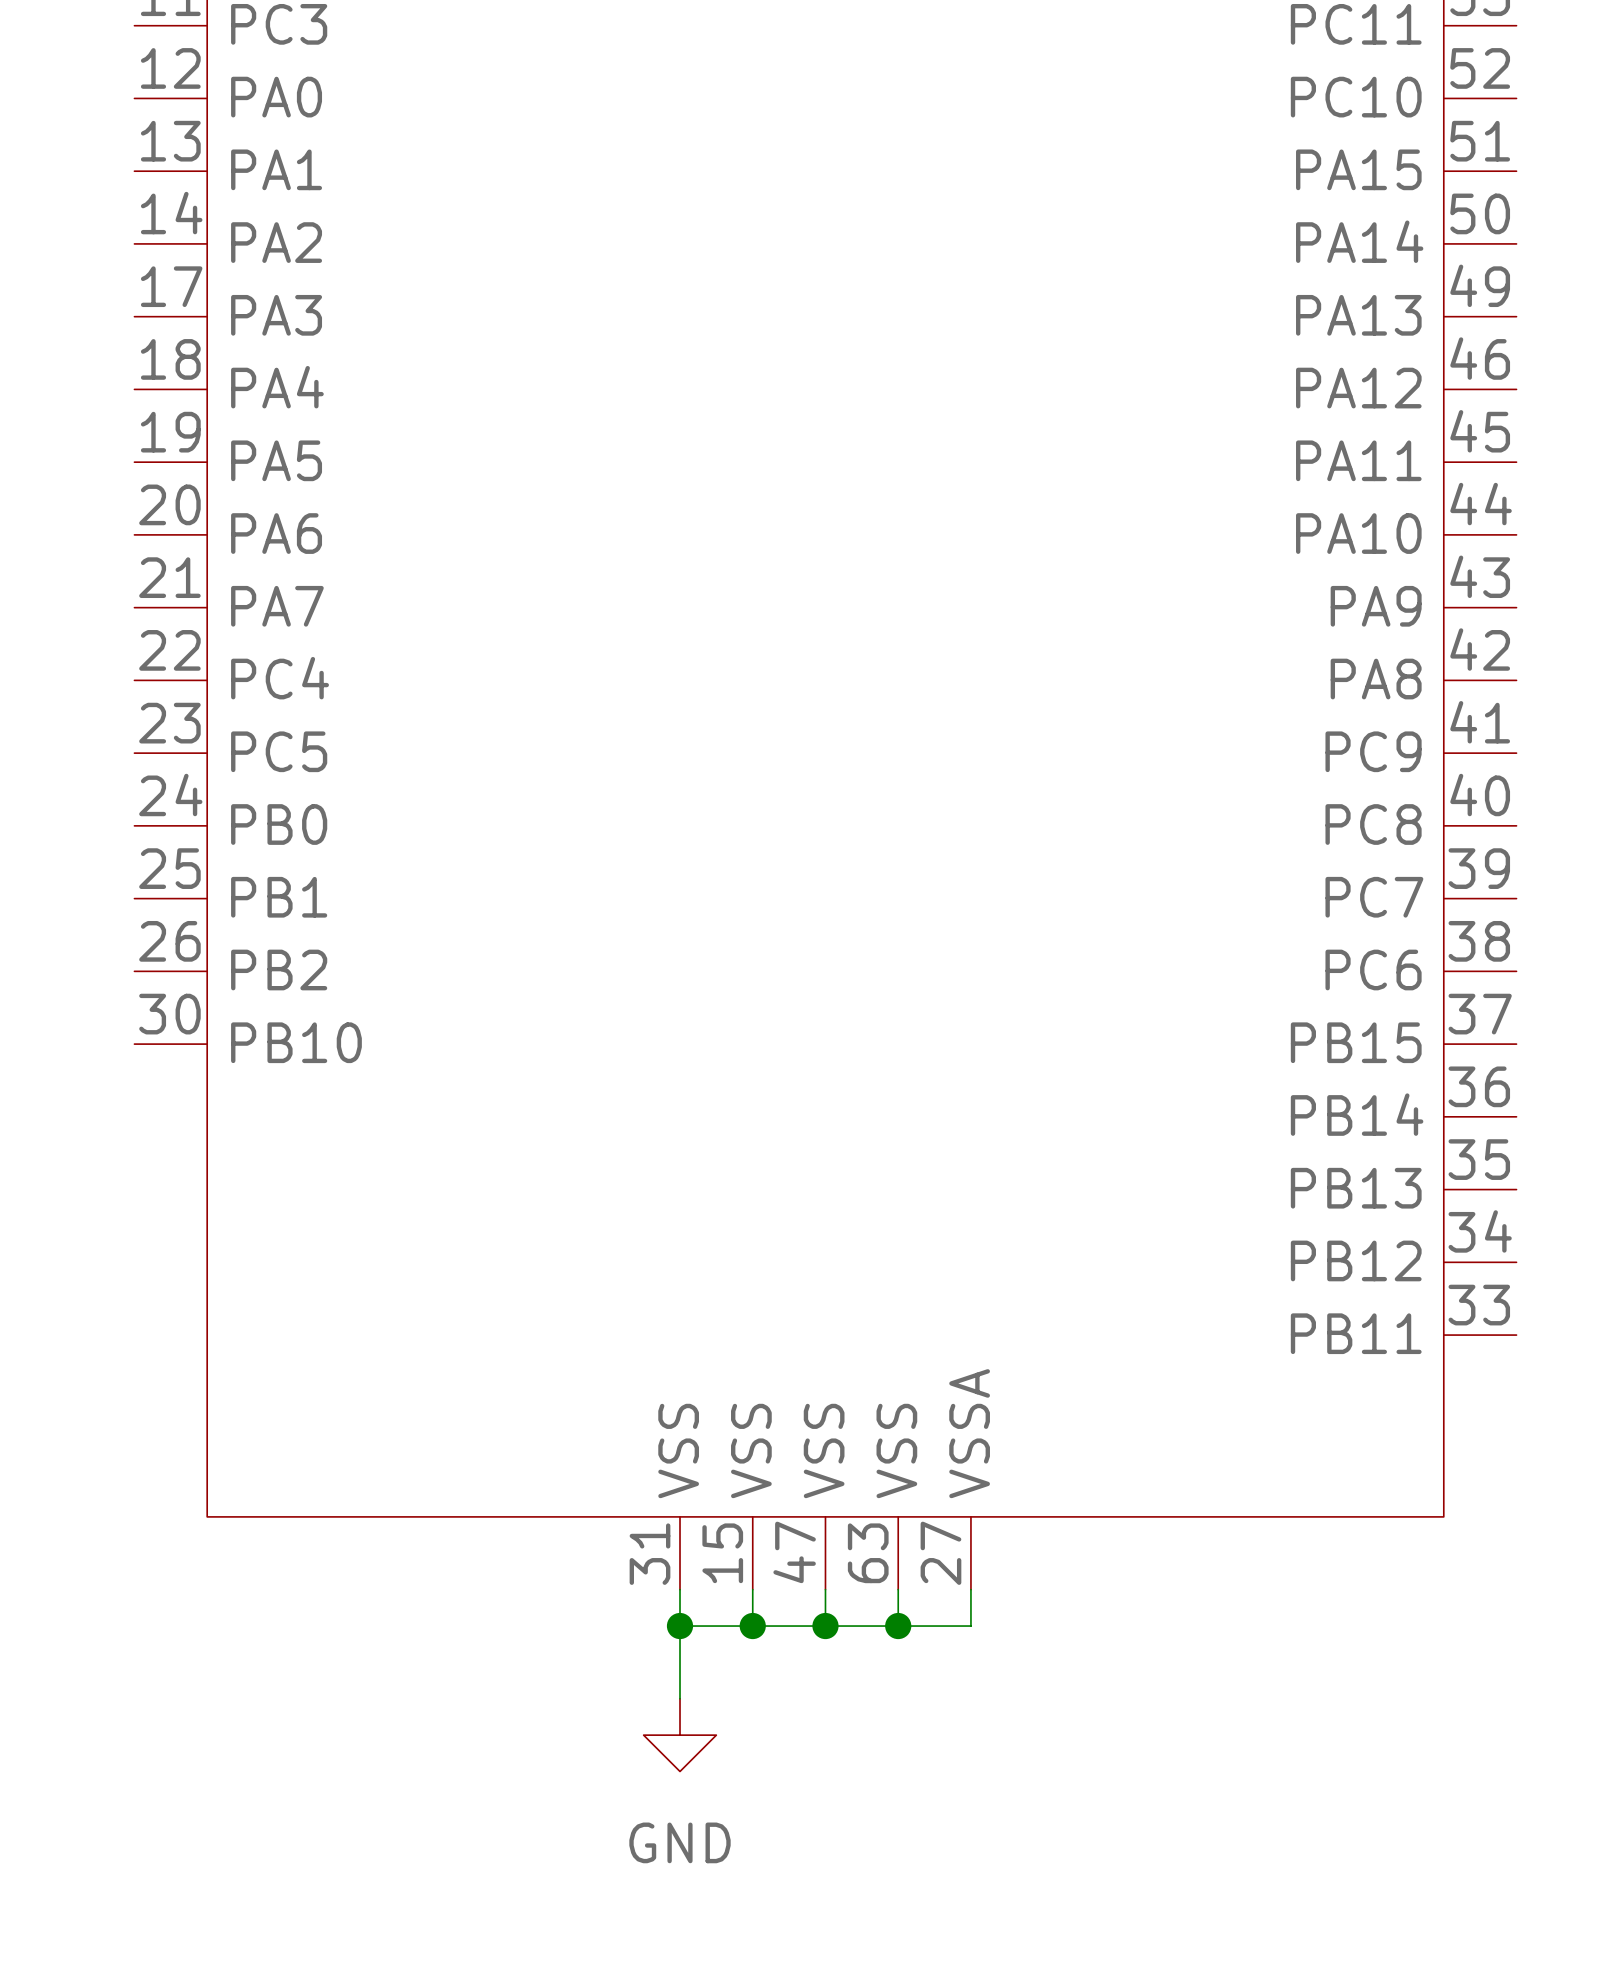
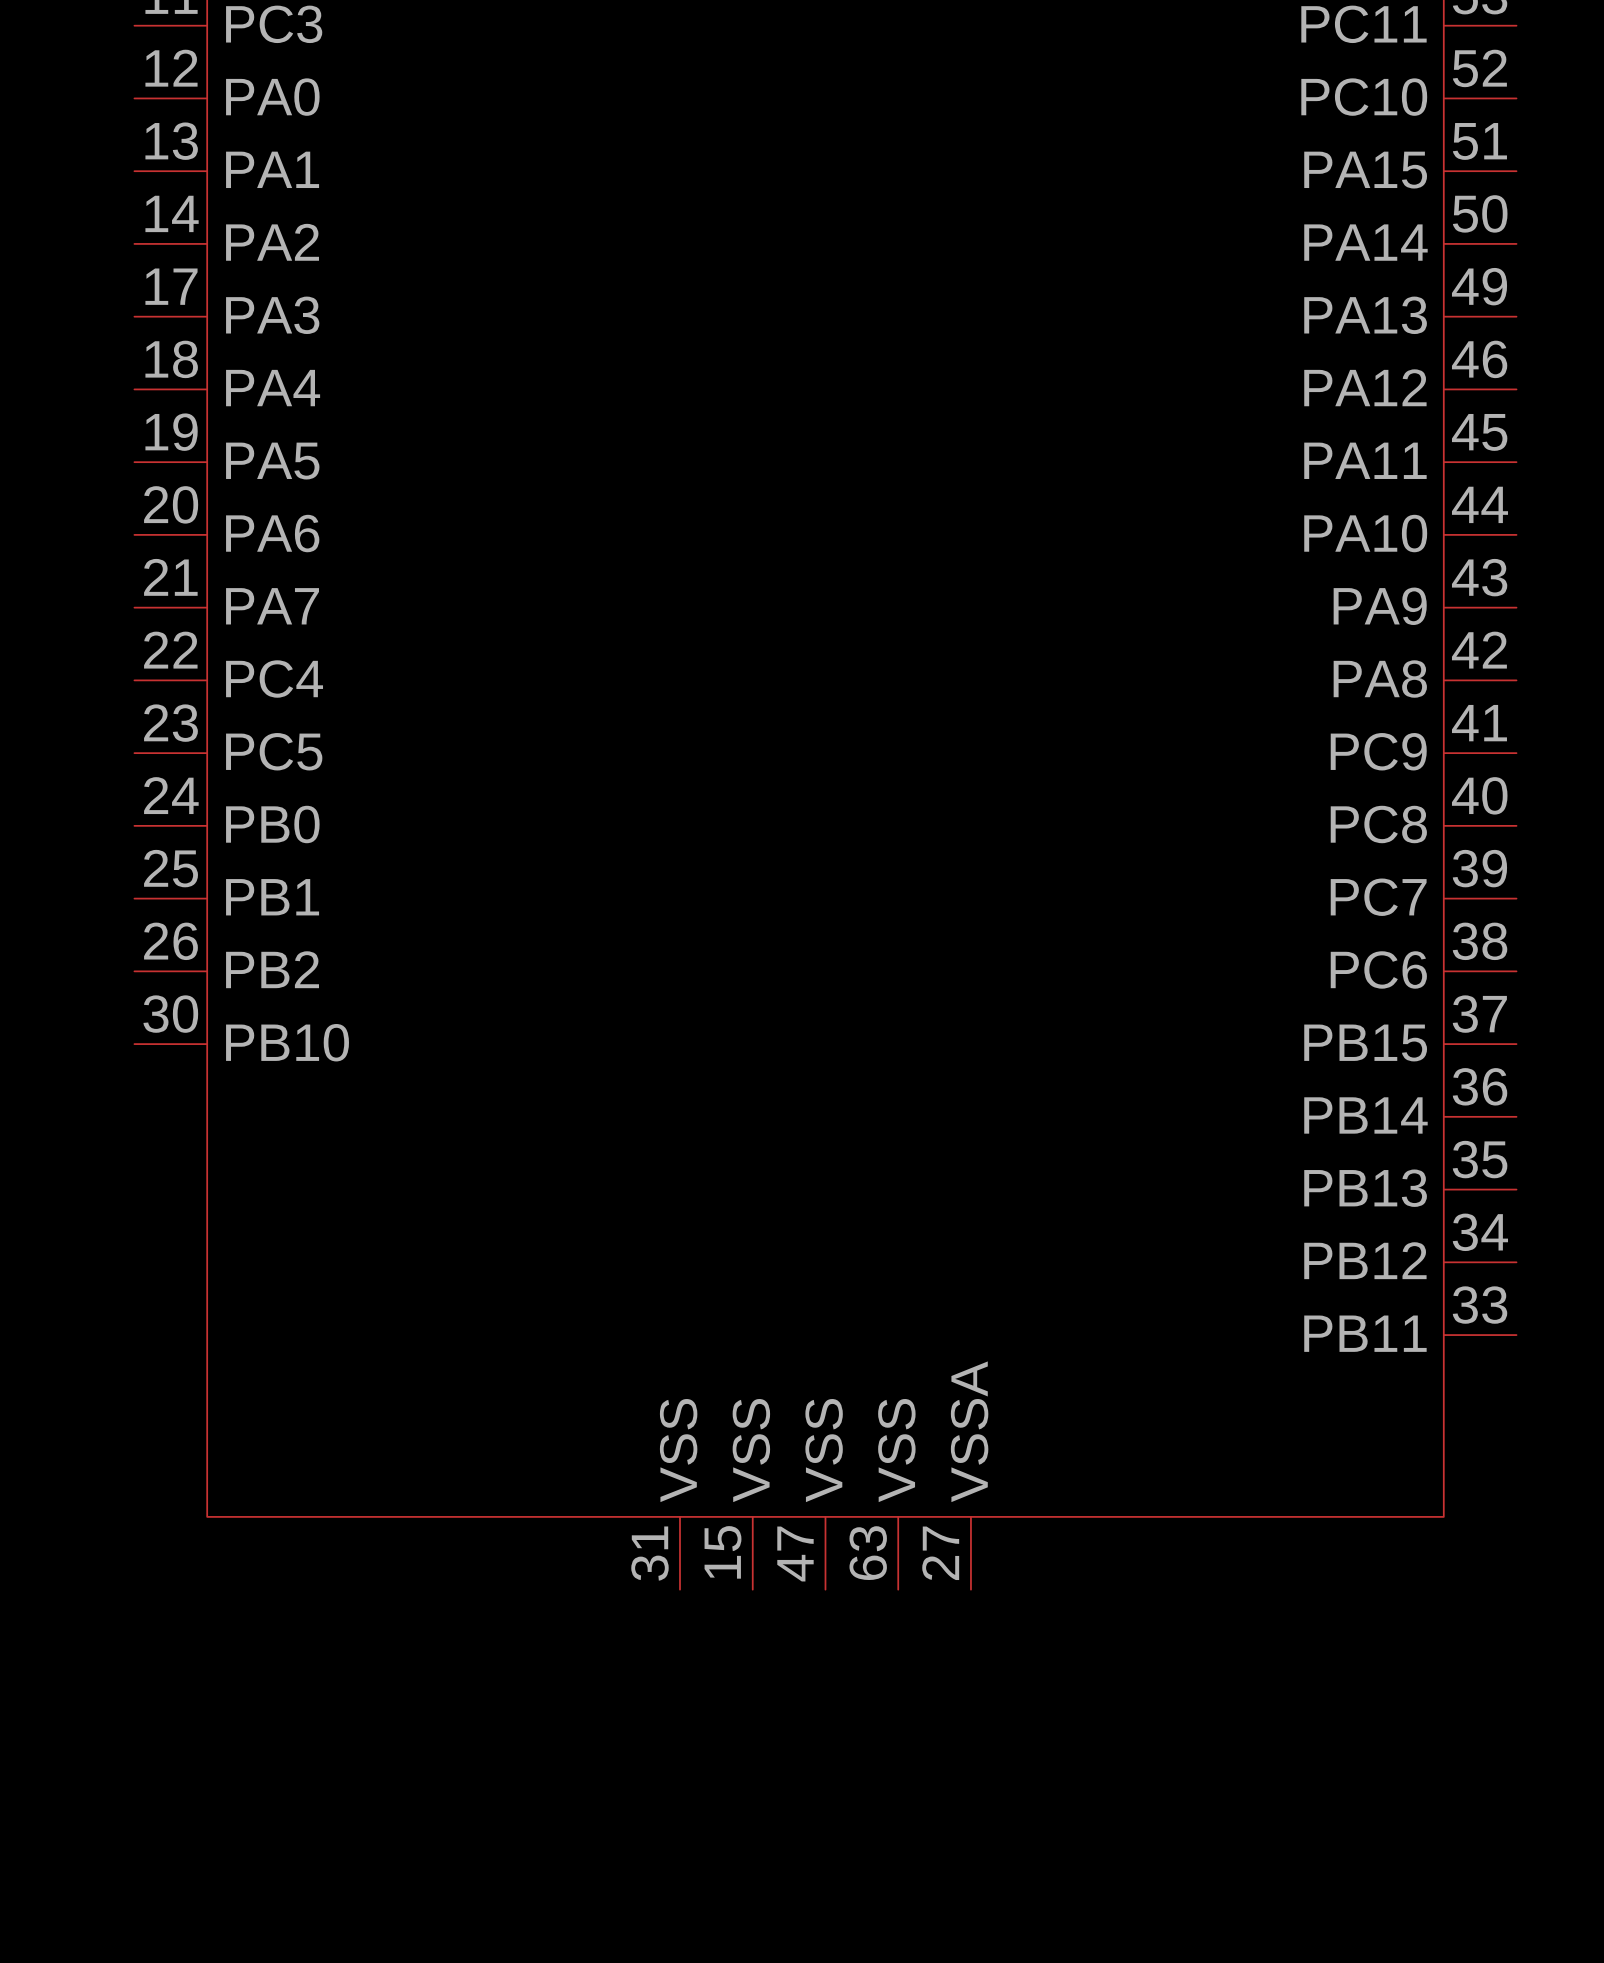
wire: (680, 1589) (680, 1698) -> none
wire: (752, 1589) (752, 1626) -> none
wire: (825, 1589) (825, 1626) -> none
wire: (898, 1589) (898, 1626) -> none
wire: (970, 1589) (970, 1626) (680, 1626) -> none
junction: (680, 1626) -> none
junction: (752, 1626) -> none
junction: (825, 1626) -> none
junction: (898, 1626) -> none
power symbol: GND (680, 1735) -> none

